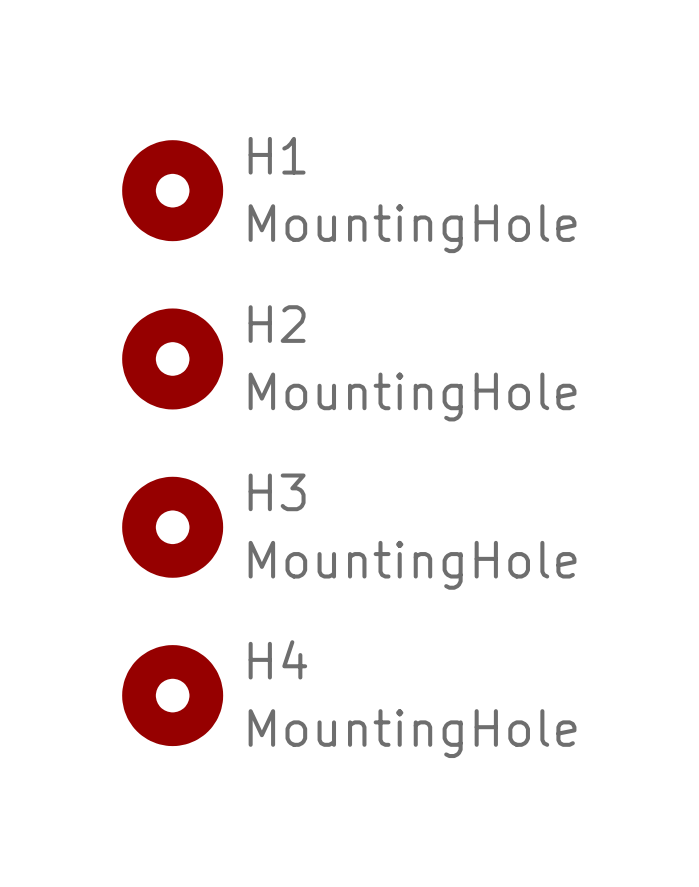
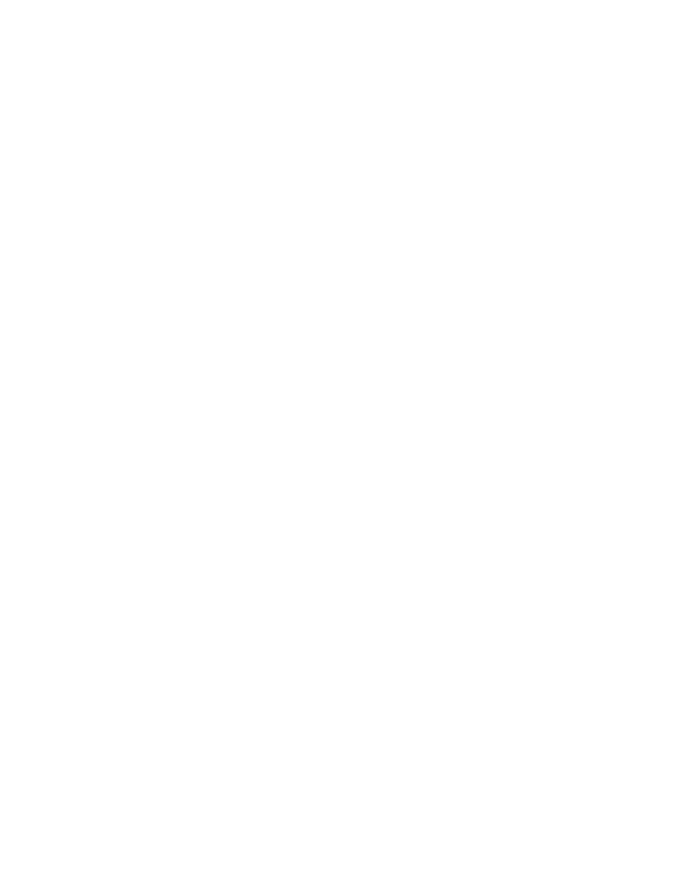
H1: MountingHole (172, 190) -> none
H2: MountingHole (172, 358) -> none
H3: MountingHole (172, 527) -> none
H4: MountingHole (172, 695) -> none

